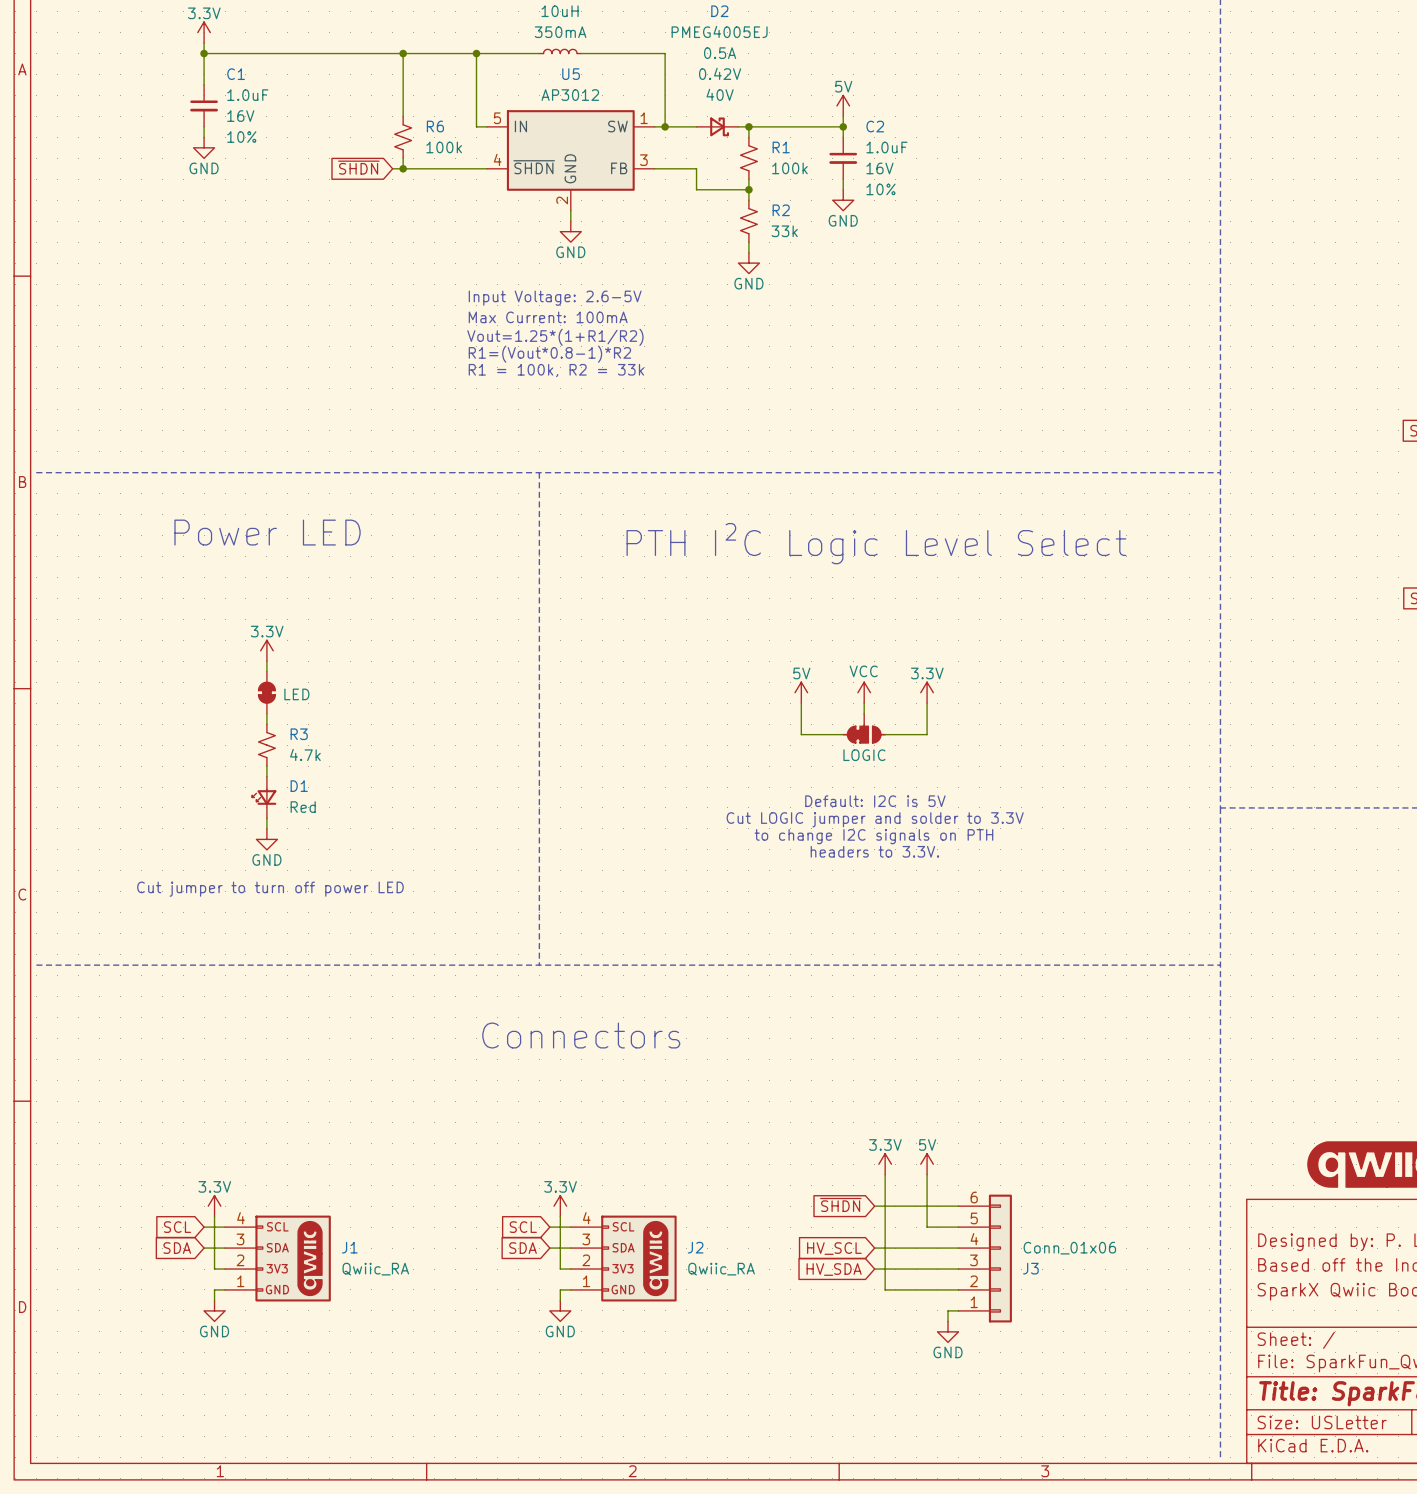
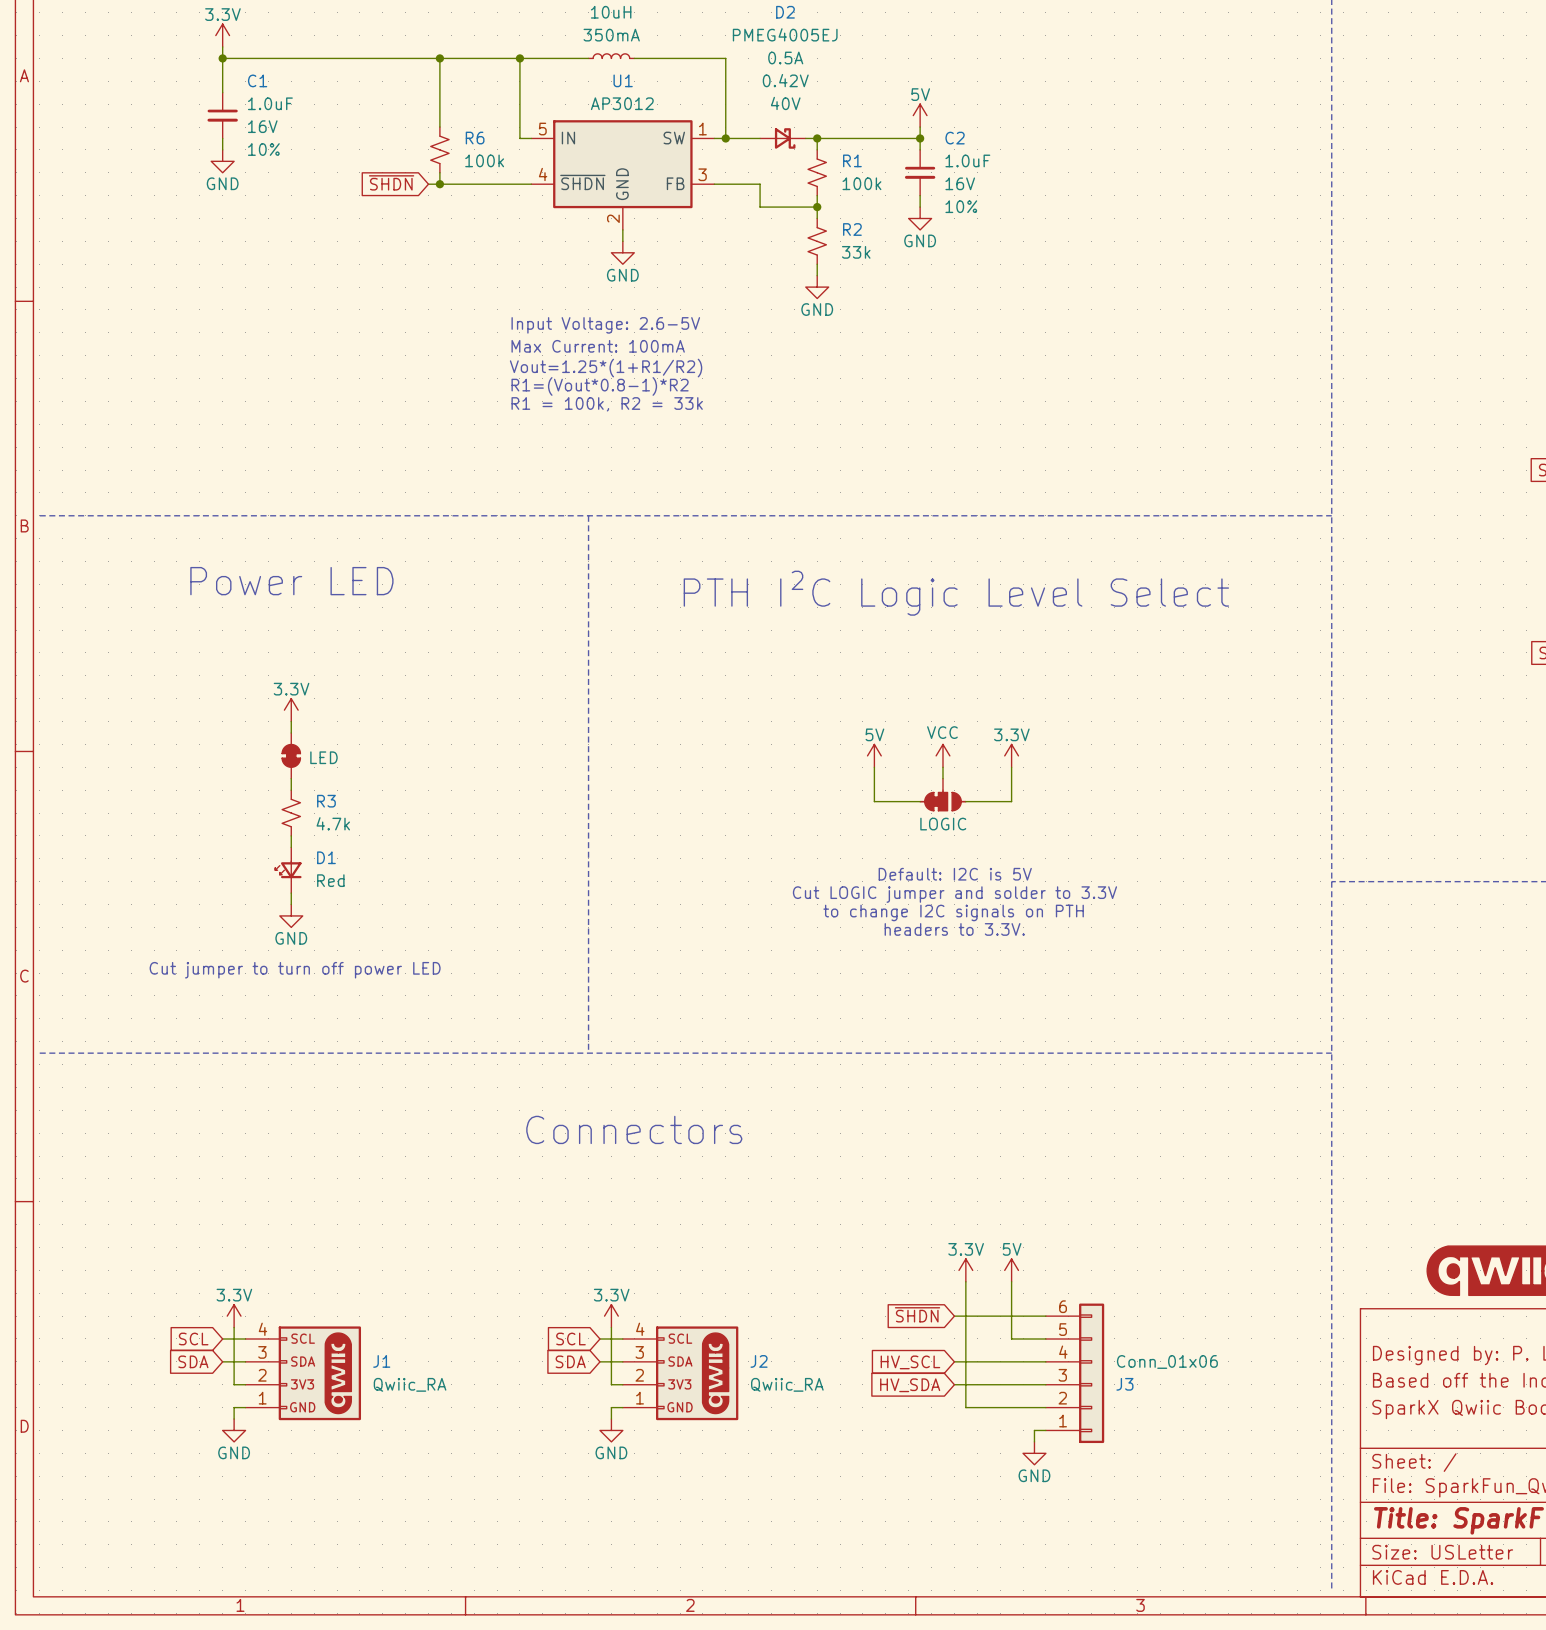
U5 name: U5 (571, 74) -> U1 (623, 80)

